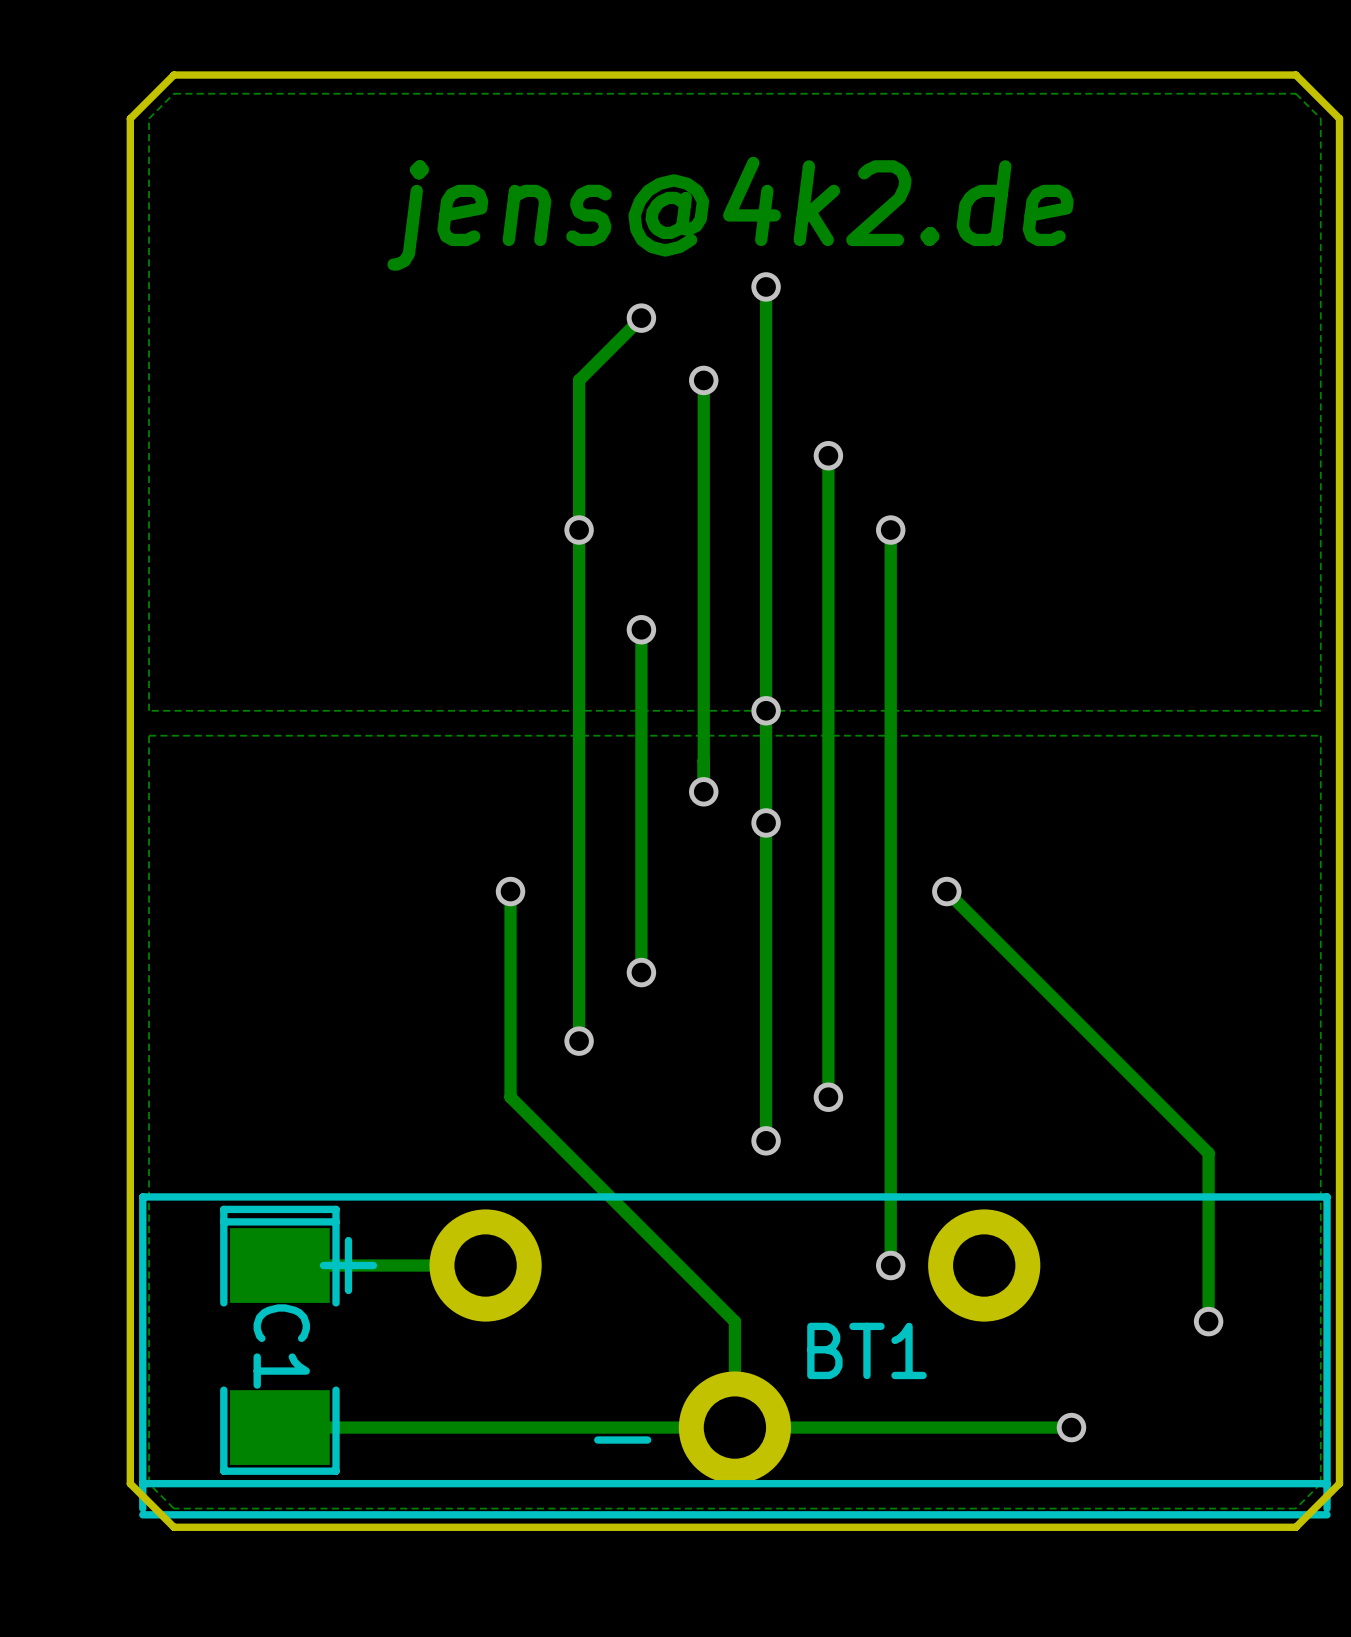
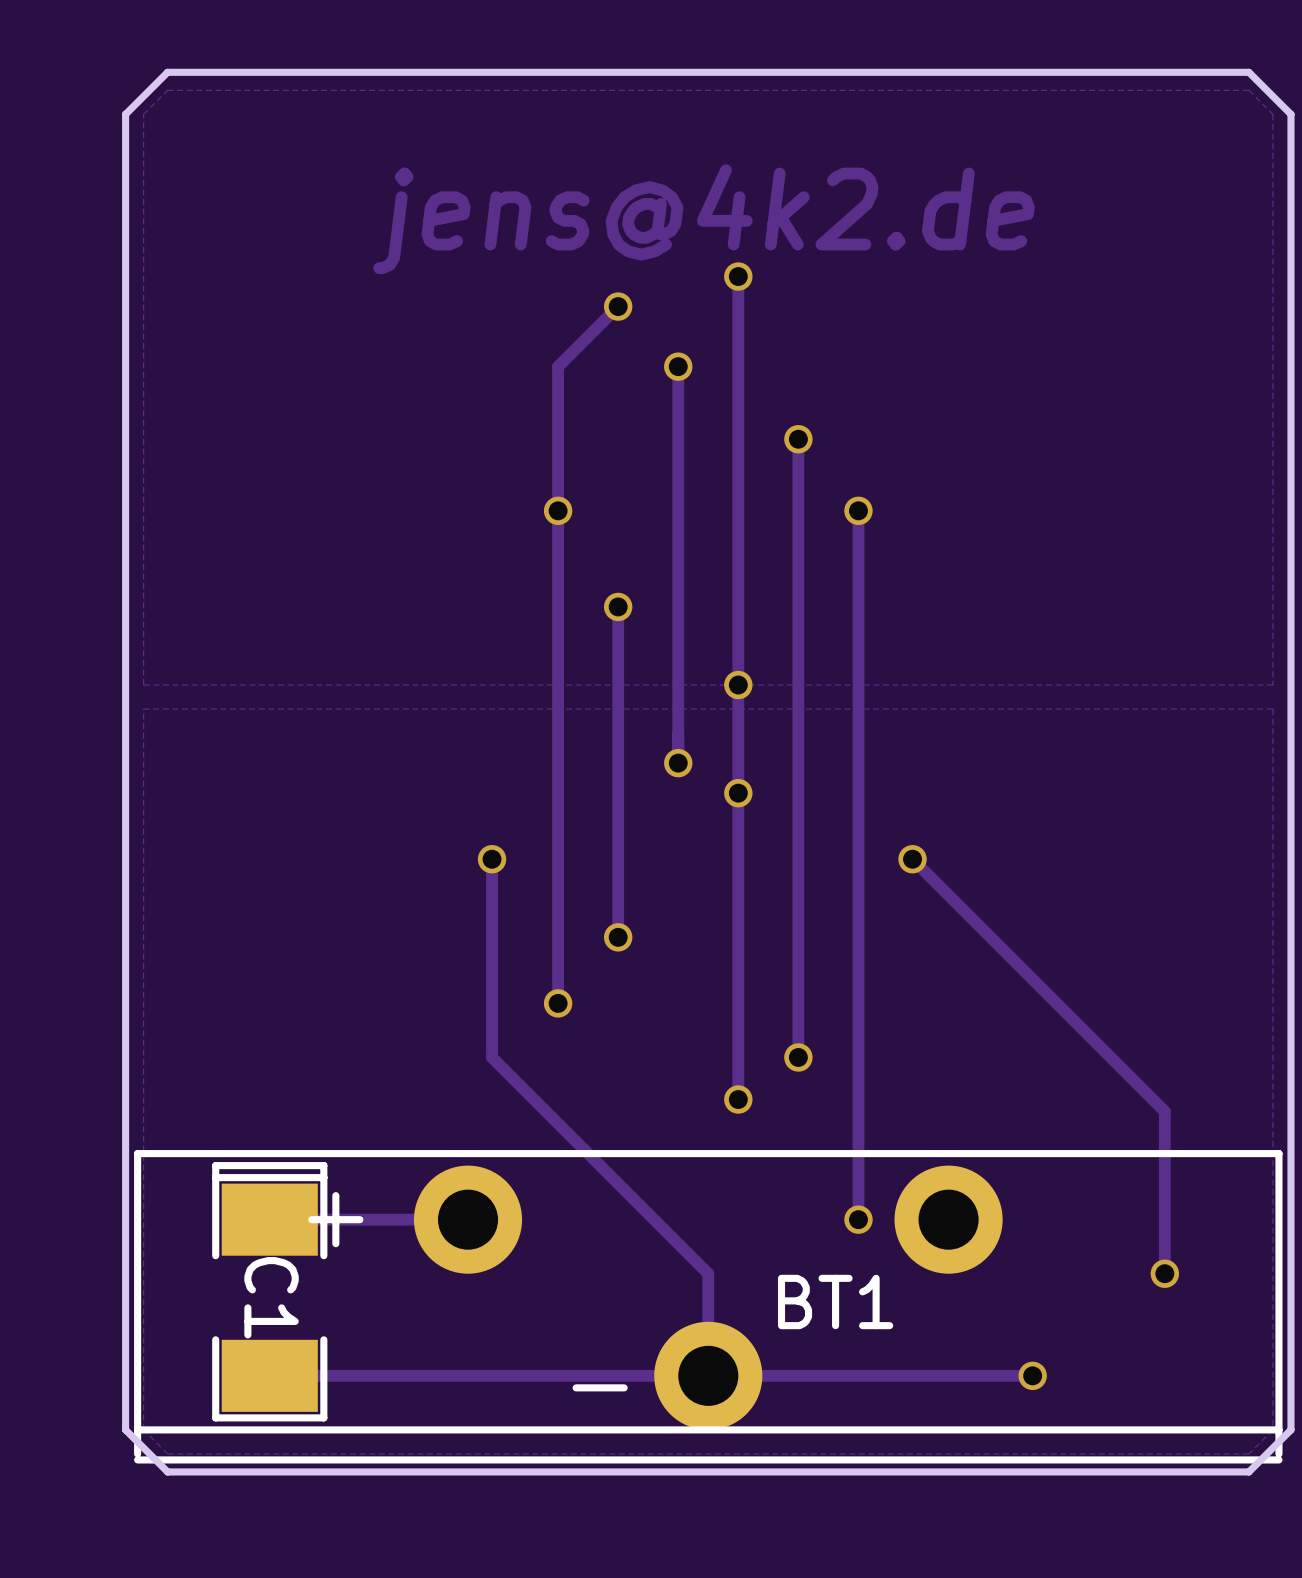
text position: jens@4k2.de (730, 213) -> jens@4k2.de (704, 219)

